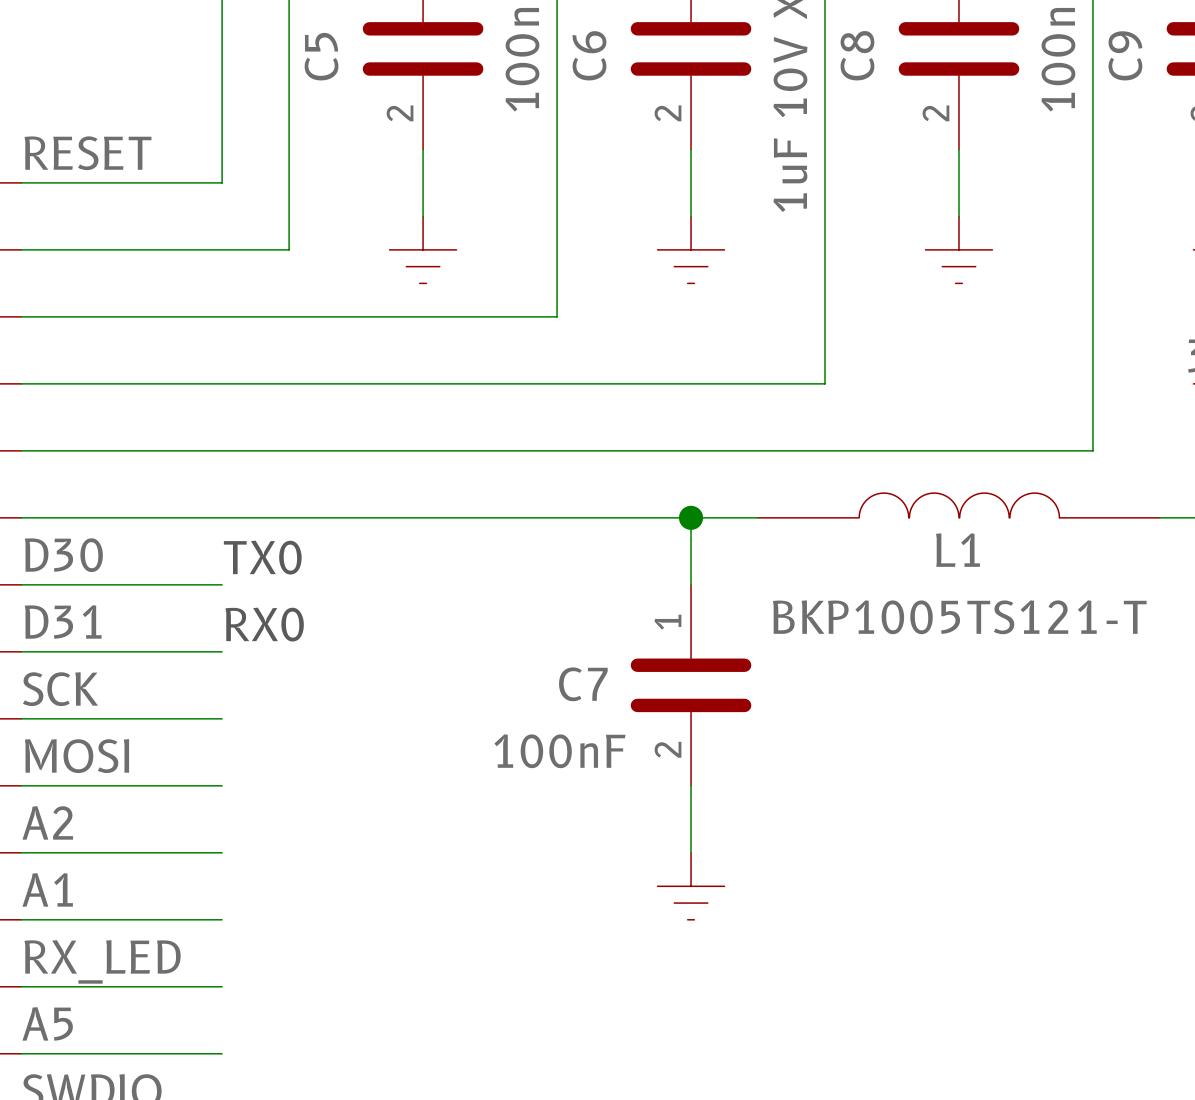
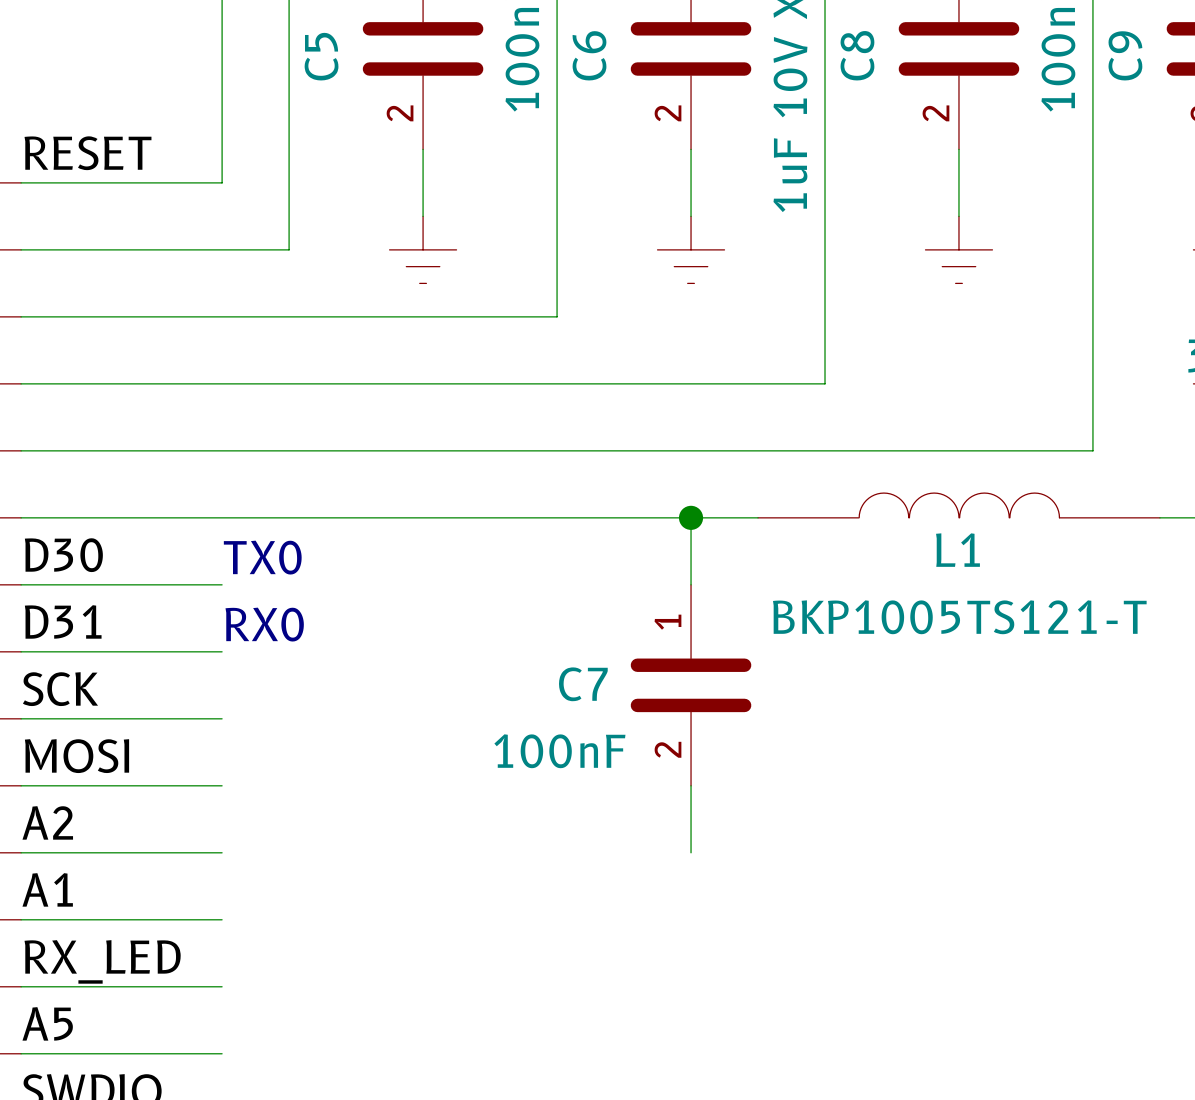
power symbol: (691, 886) -> none

